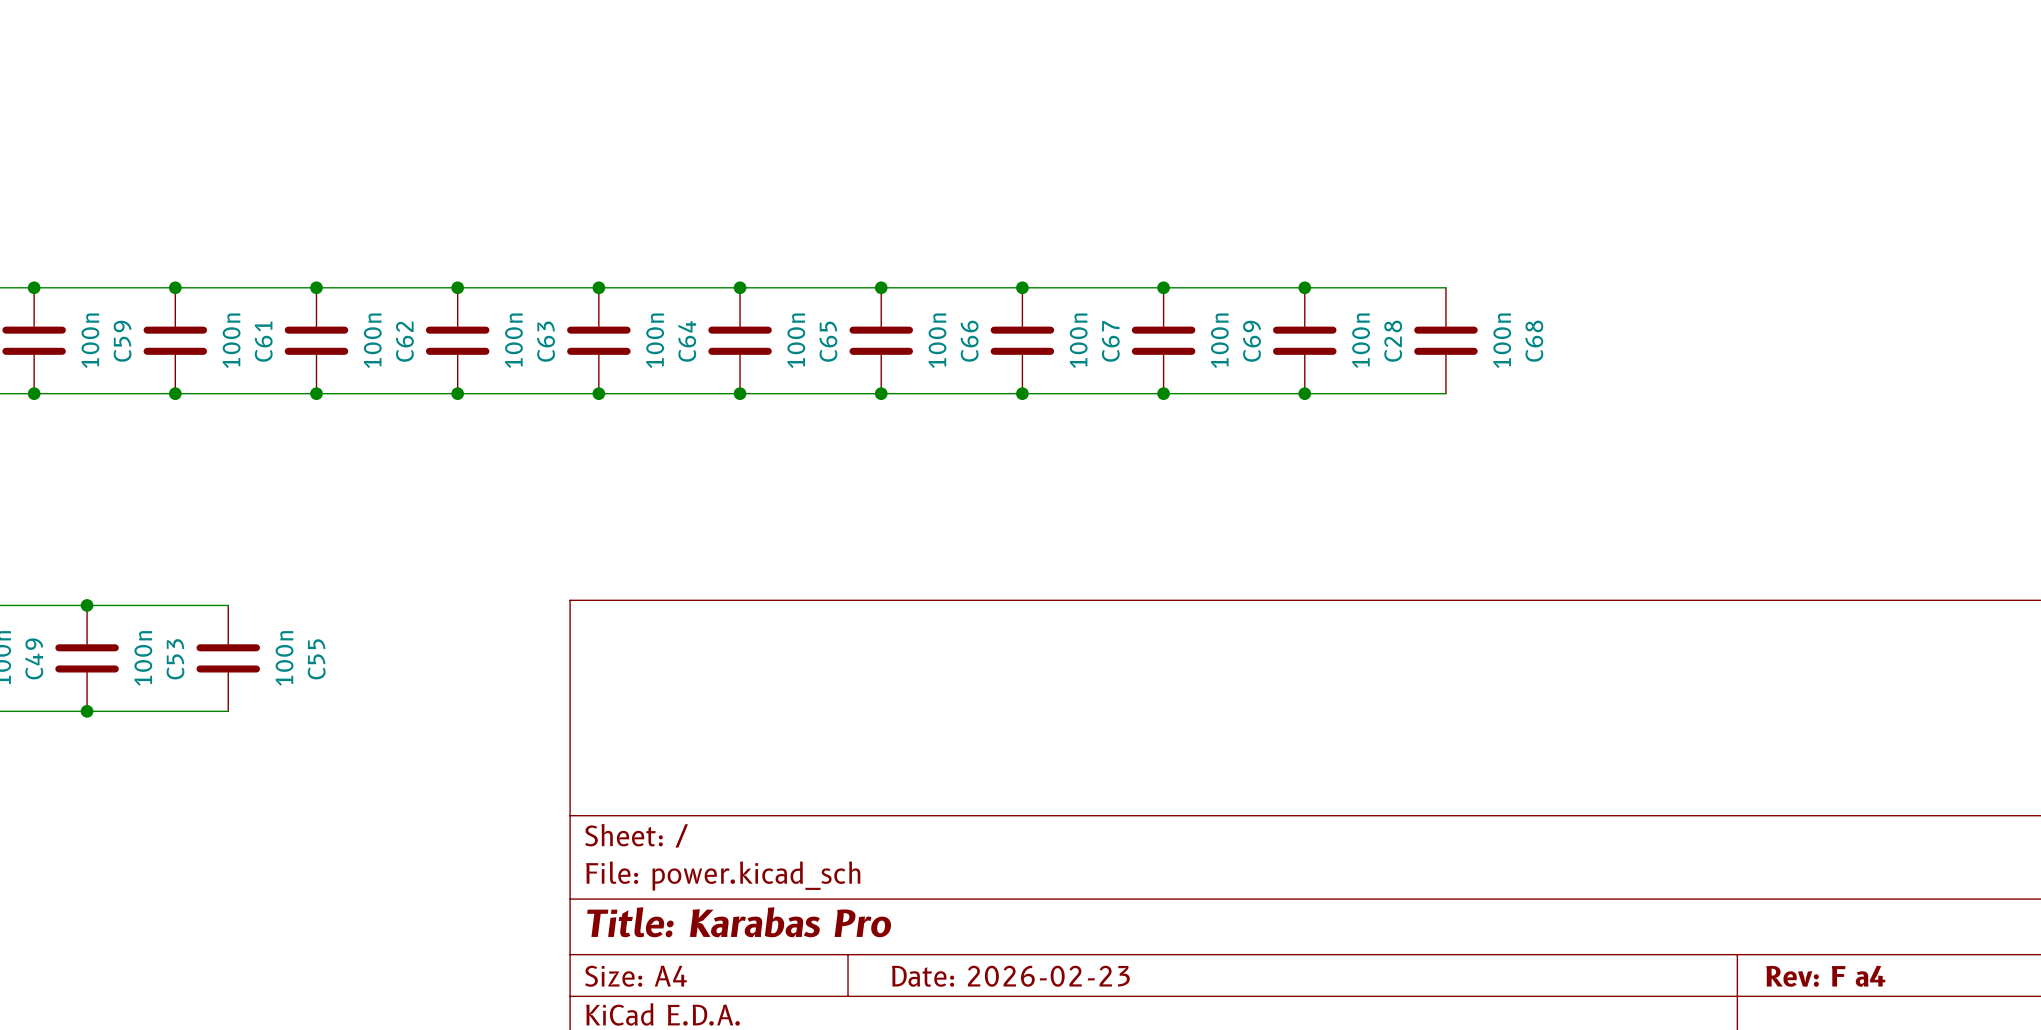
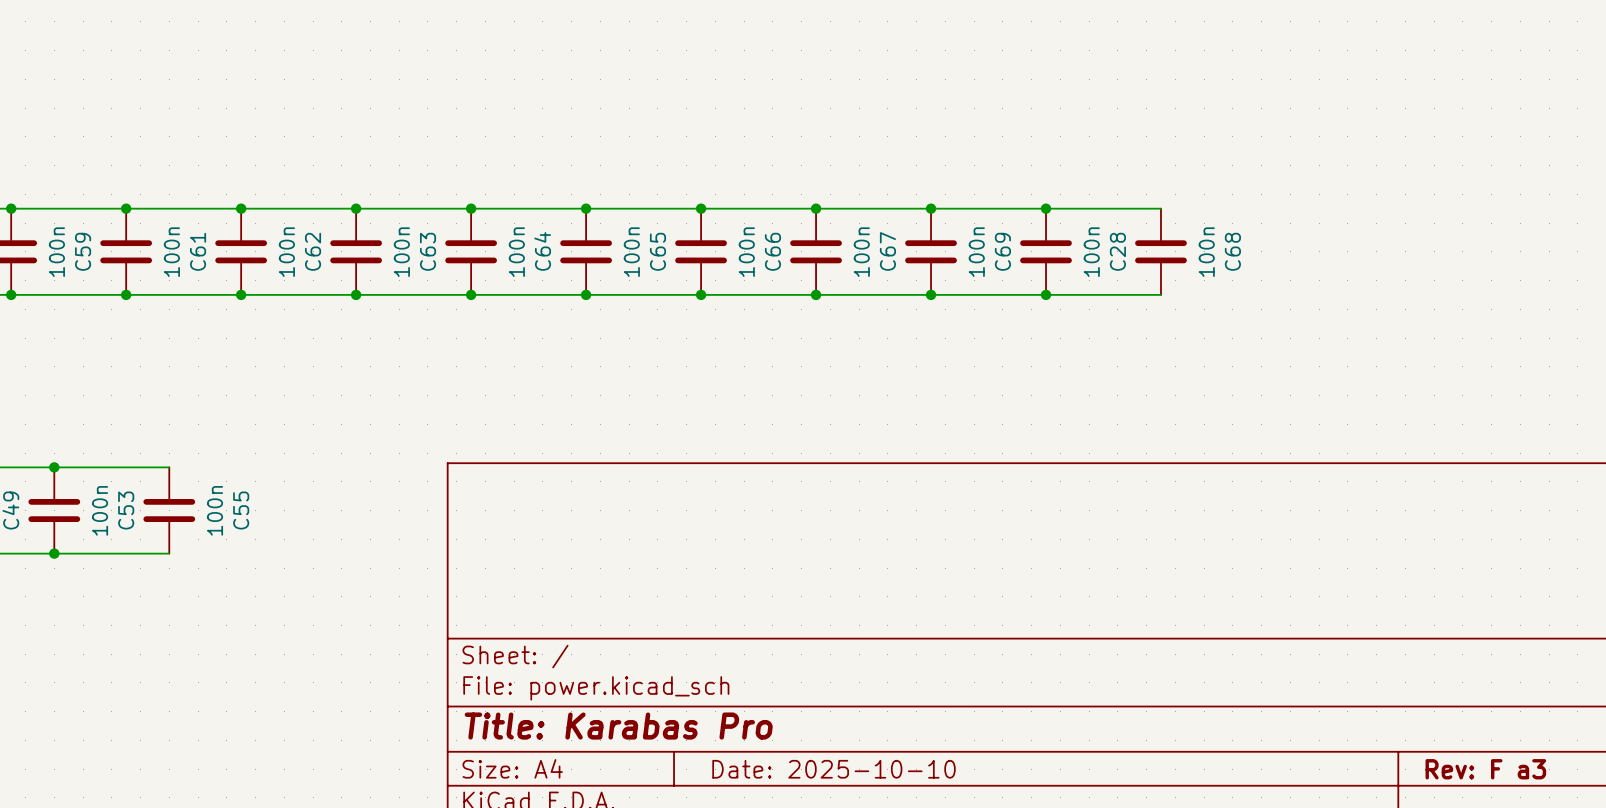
title block: Date: 2026-02-23 (1010, 976) -> Date: 2025-10-10 (833, 769)
title block: Rev: F a4 (1825, 976) -> Rev: F a3 (1485, 769)

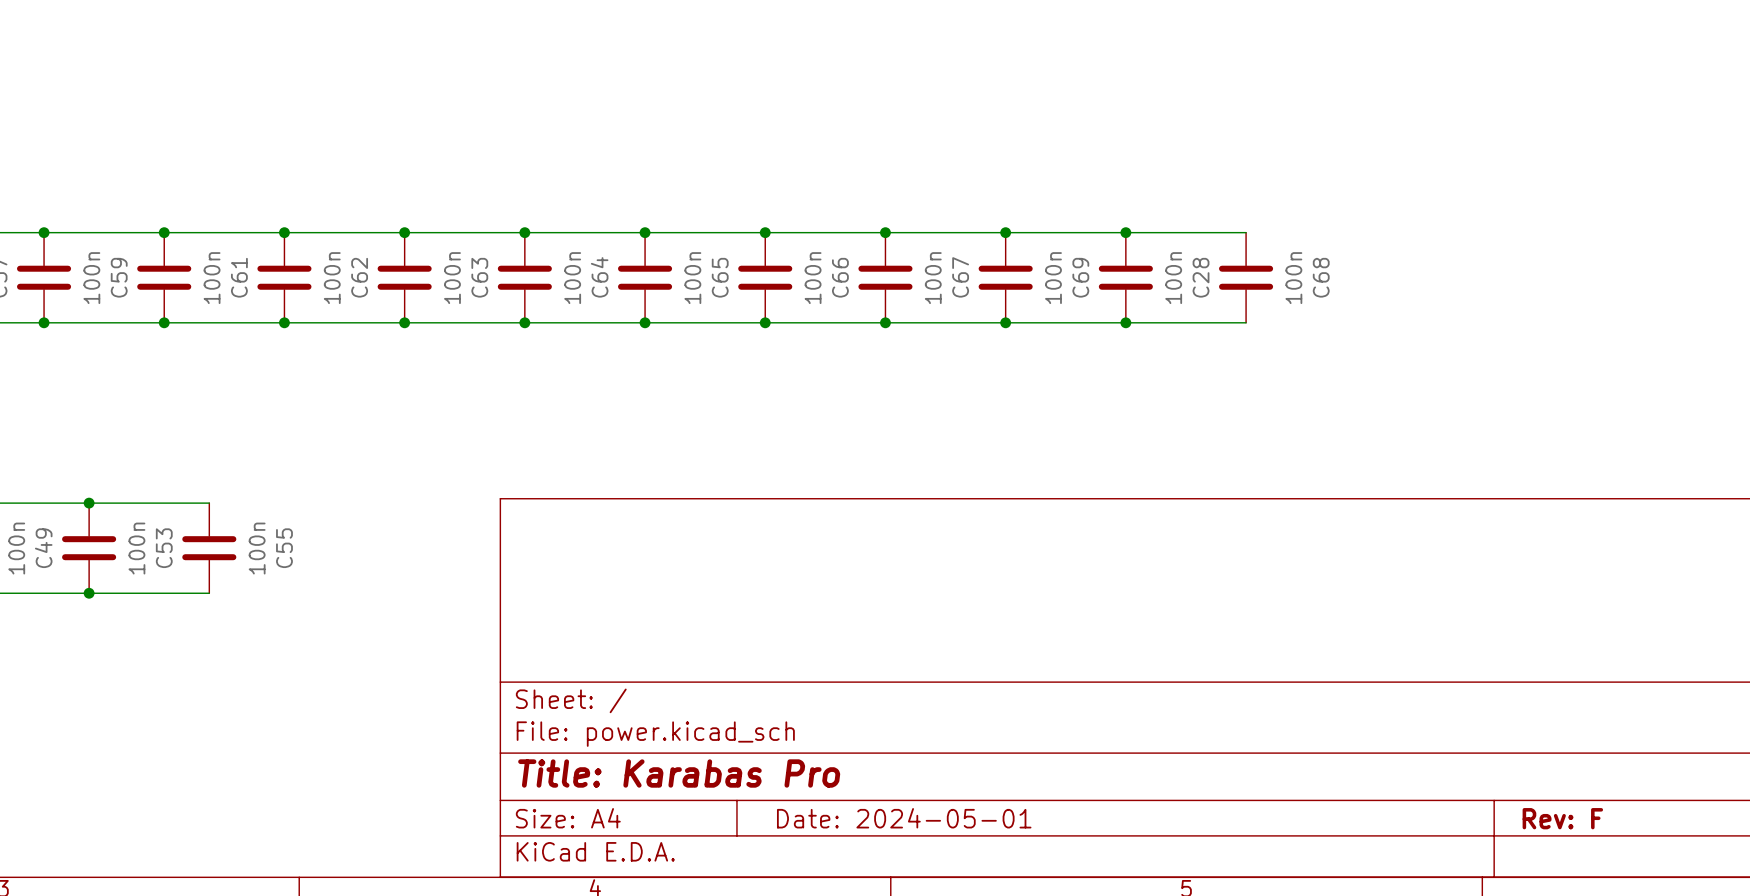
title block: Date: 2025-10-10 (833, 769) -> Date: 2024-05-01 (904, 818)
title block: Rev: F a3 (1485, 769) -> Rev: F (1562, 818)

